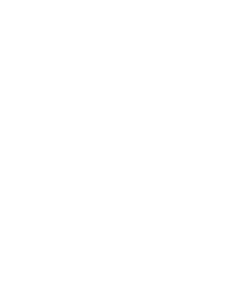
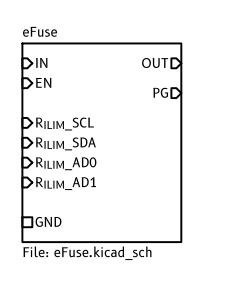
sheet pin: none -> IN (41, 62)
sheet pin: none -> OUT (155, 63)
sheet pin: none -> EN (43, 82)
sheet pin: none -> PG (160, 92)
sheet pin: none -> RILIM_SCL (64, 124)
sheet eFuse: none -> File: eFuse.kicad_sch (101, 142)
sheet pin: none -> RILIM_SDA (65, 143)
sheet pin: none -> RILIM_AD0 (66, 163)
sheet pin: none -> RILIM_AD1 (65, 183)
sheet pin: none -> GND (48, 221)

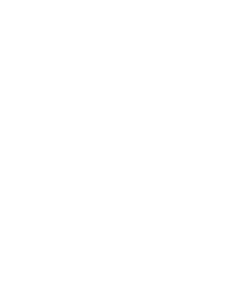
sheet pin: IN (41, 62) -> none
sheet pin: OUT (155, 63) -> none
sheet pin: EN (43, 82) -> none
sheet pin: PG (160, 92) -> none
sheet pin: RILIM_SCL (64, 124) -> none
sheet eFuse: File: eFuse.kicad_sch (101, 142) -> none
sheet pin: RILIM_SDA (65, 143) -> none
sheet pin: RILIM_AD0 (66, 163) -> none
sheet pin: RILIM_AD1 (65, 183) -> none
sheet pin: GND (48, 221) -> none

